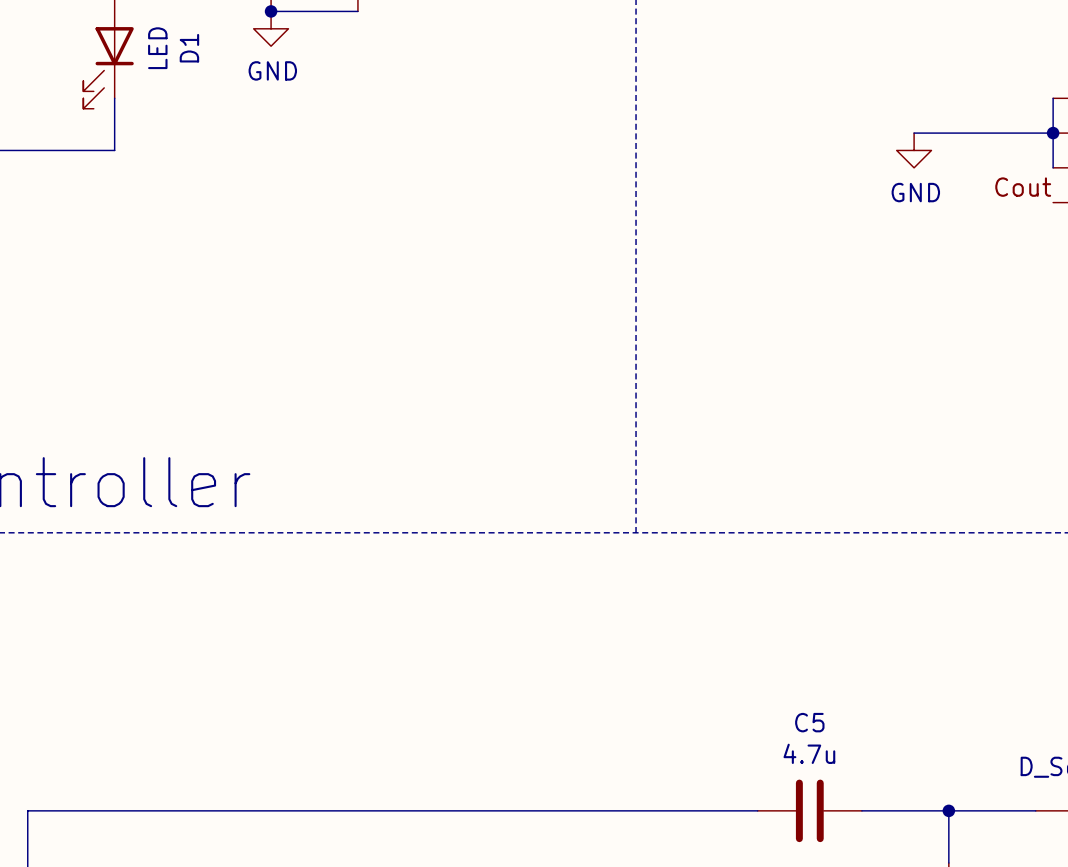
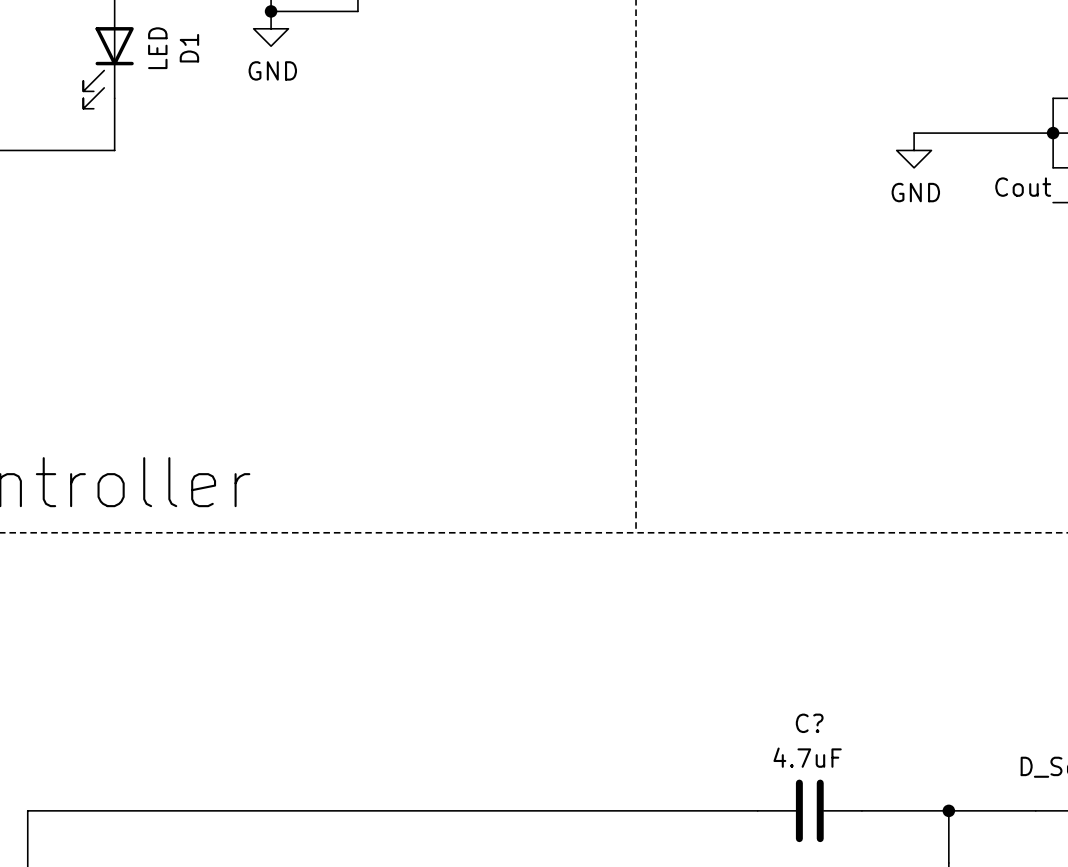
C5 name: C5 (809, 722) -> C? (809, 723)
C5 value: 4.7u (809, 753) -> 4.7uF (807, 757)

